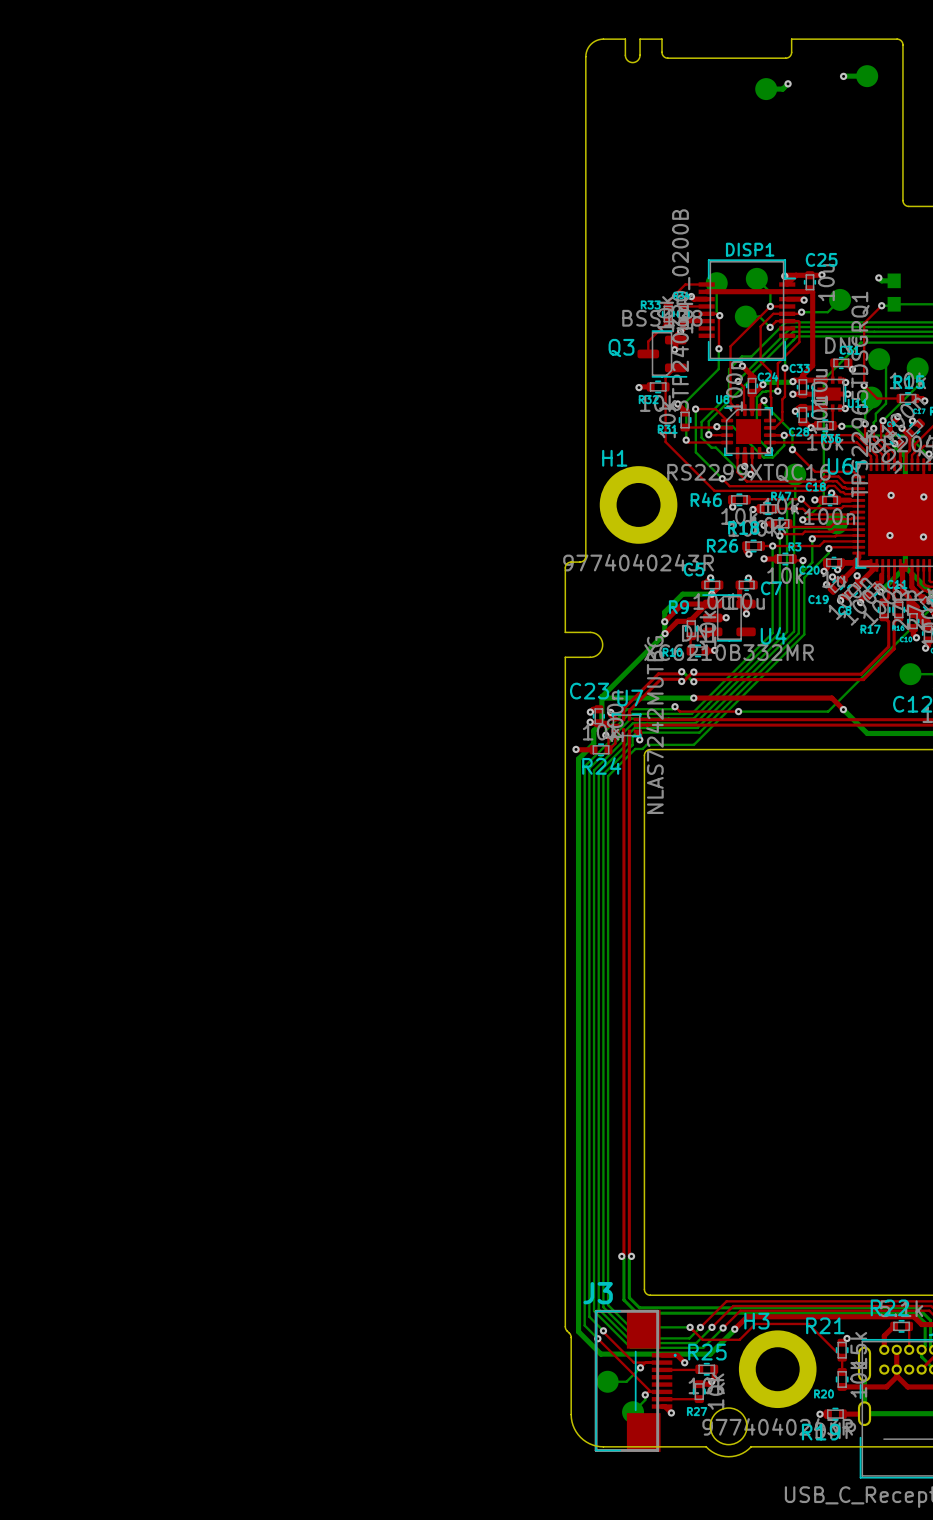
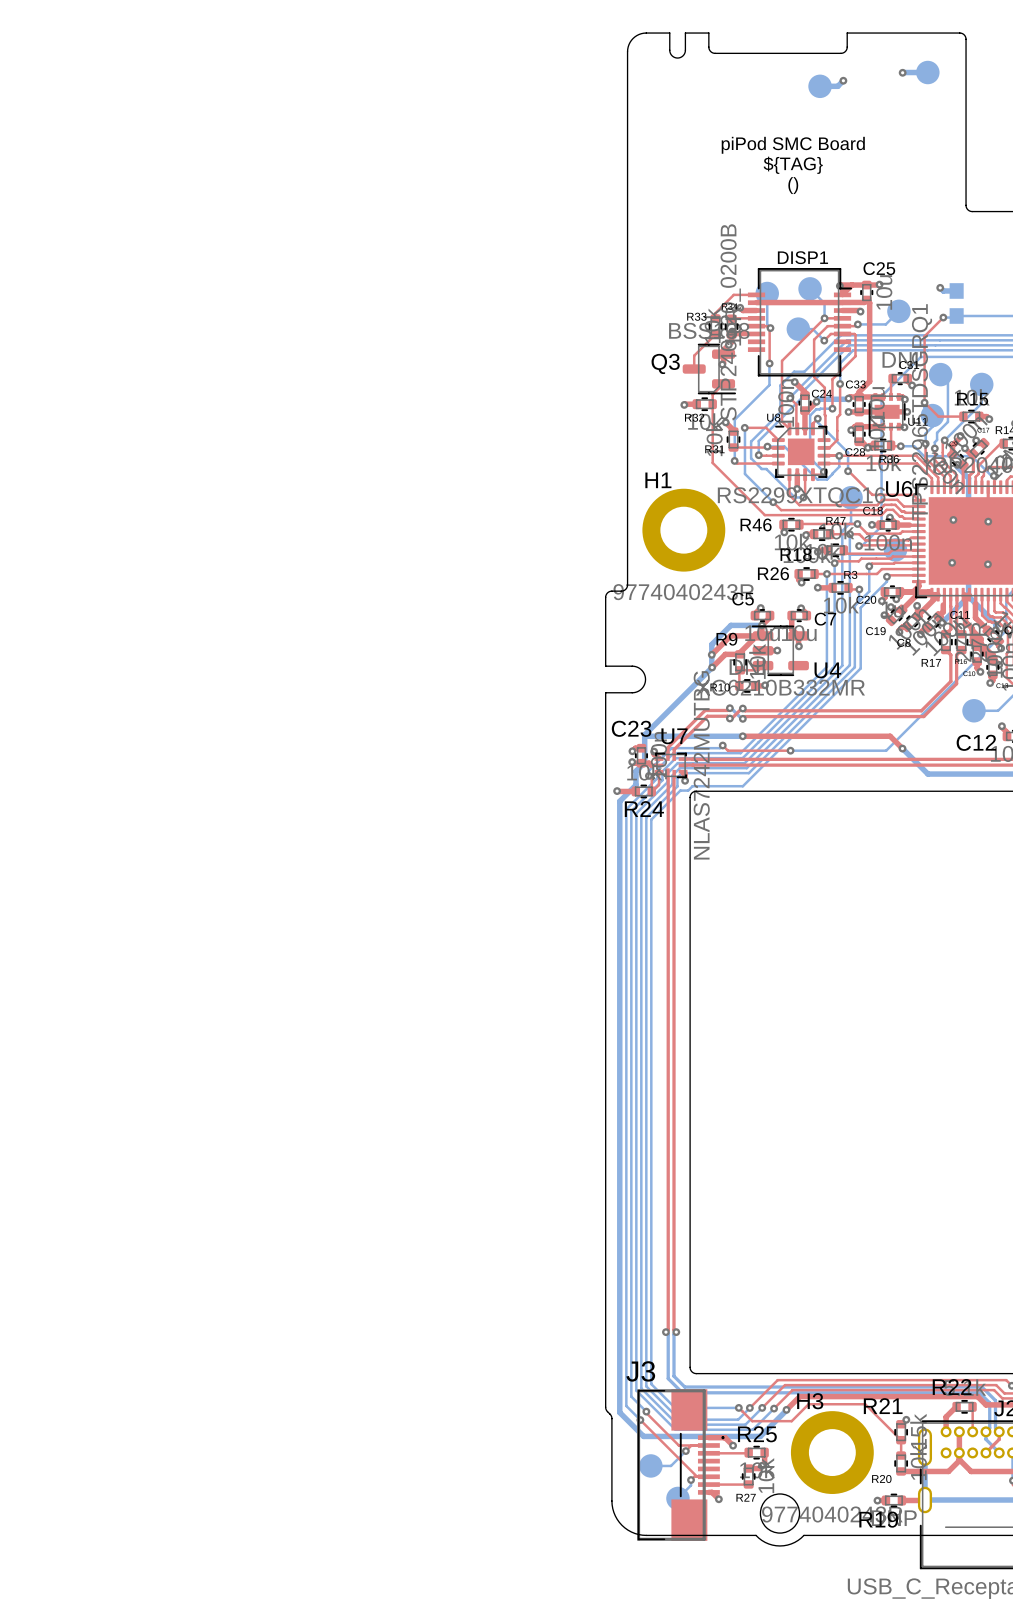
text: none -> piPod SMC Board (793, 145)
text: none -> ${TAG} (793, 165)
text: none -> () (793, 185)

